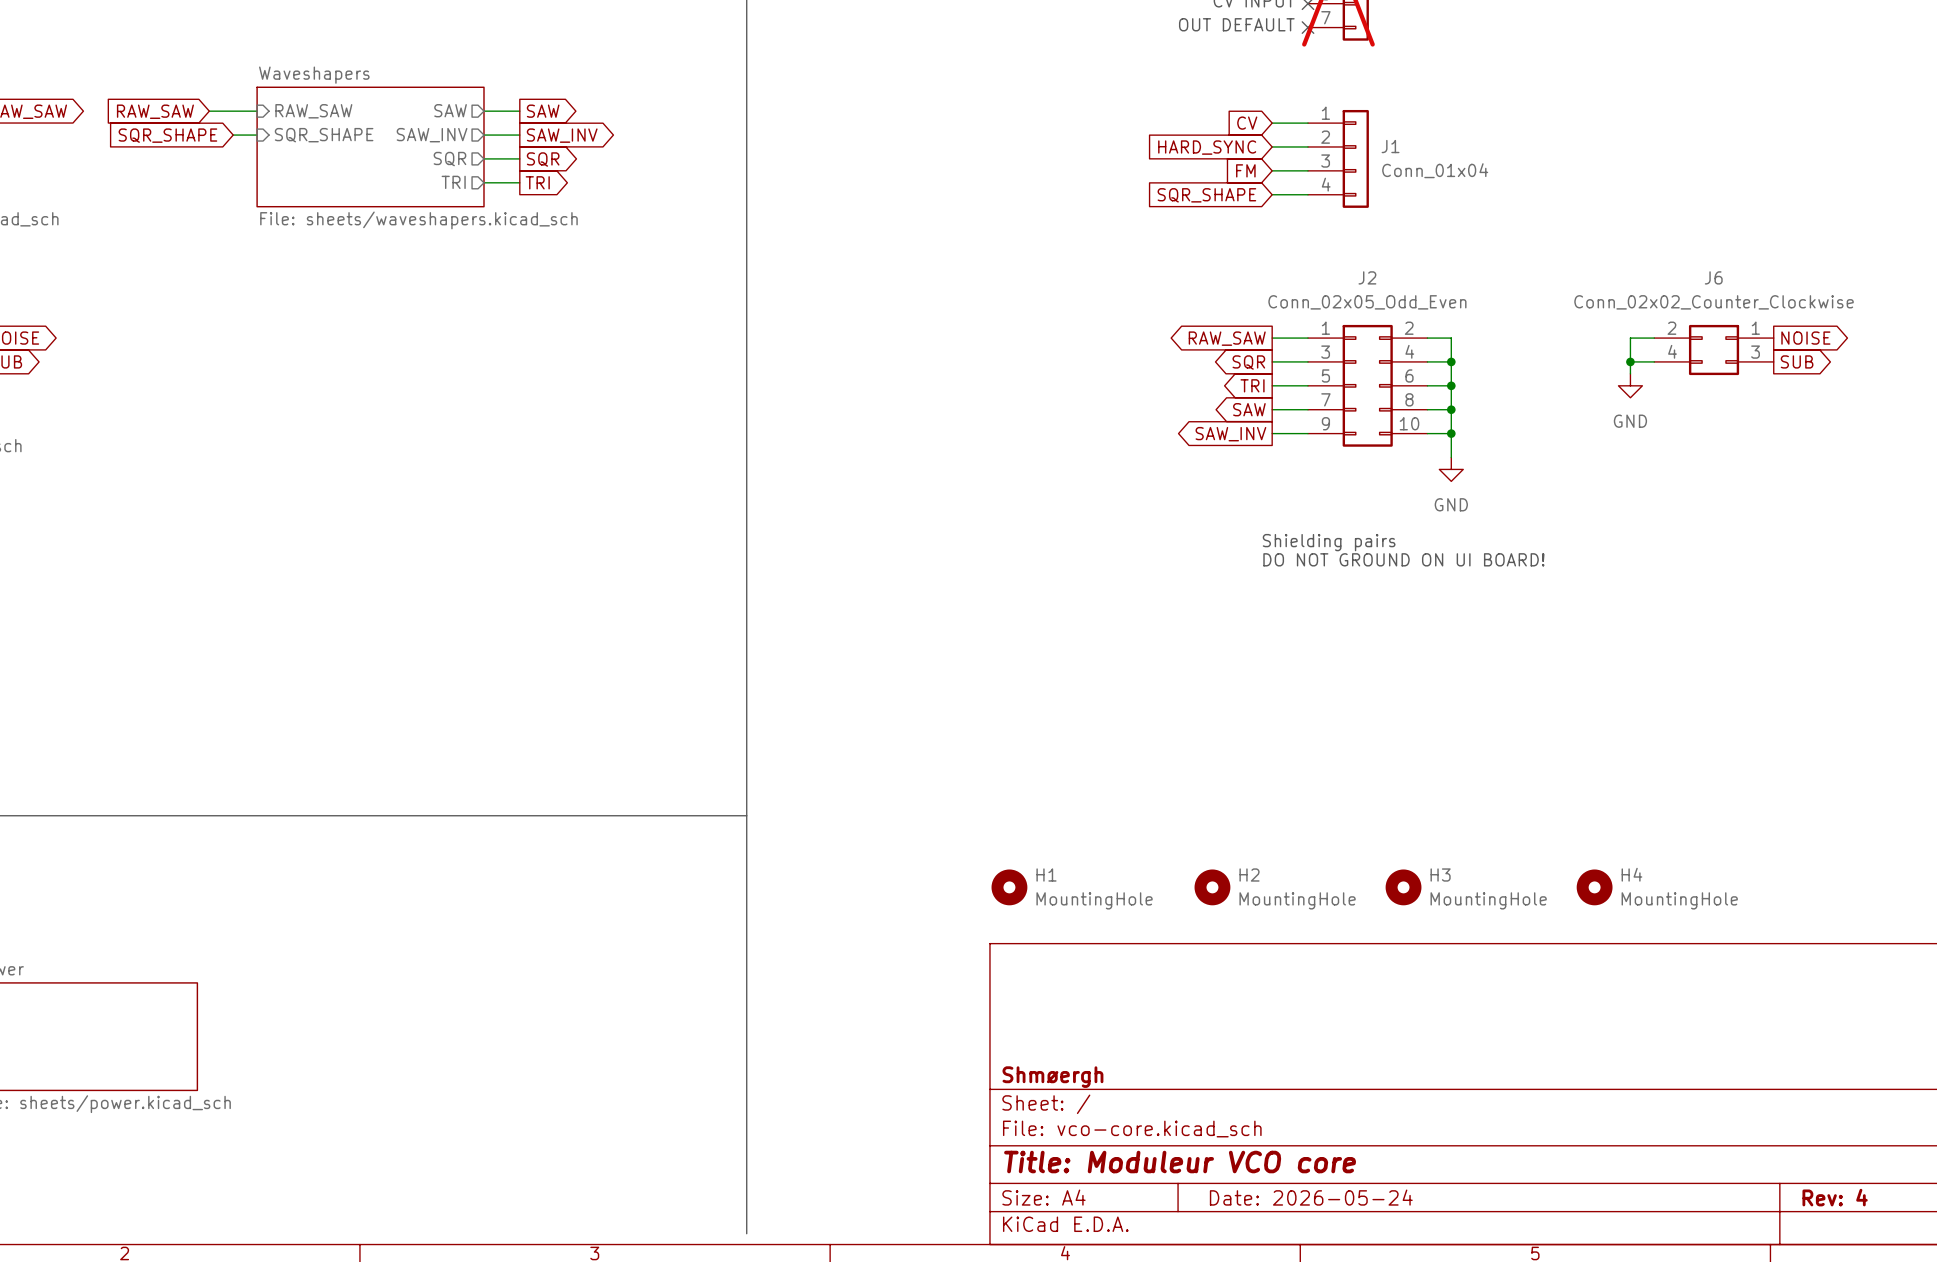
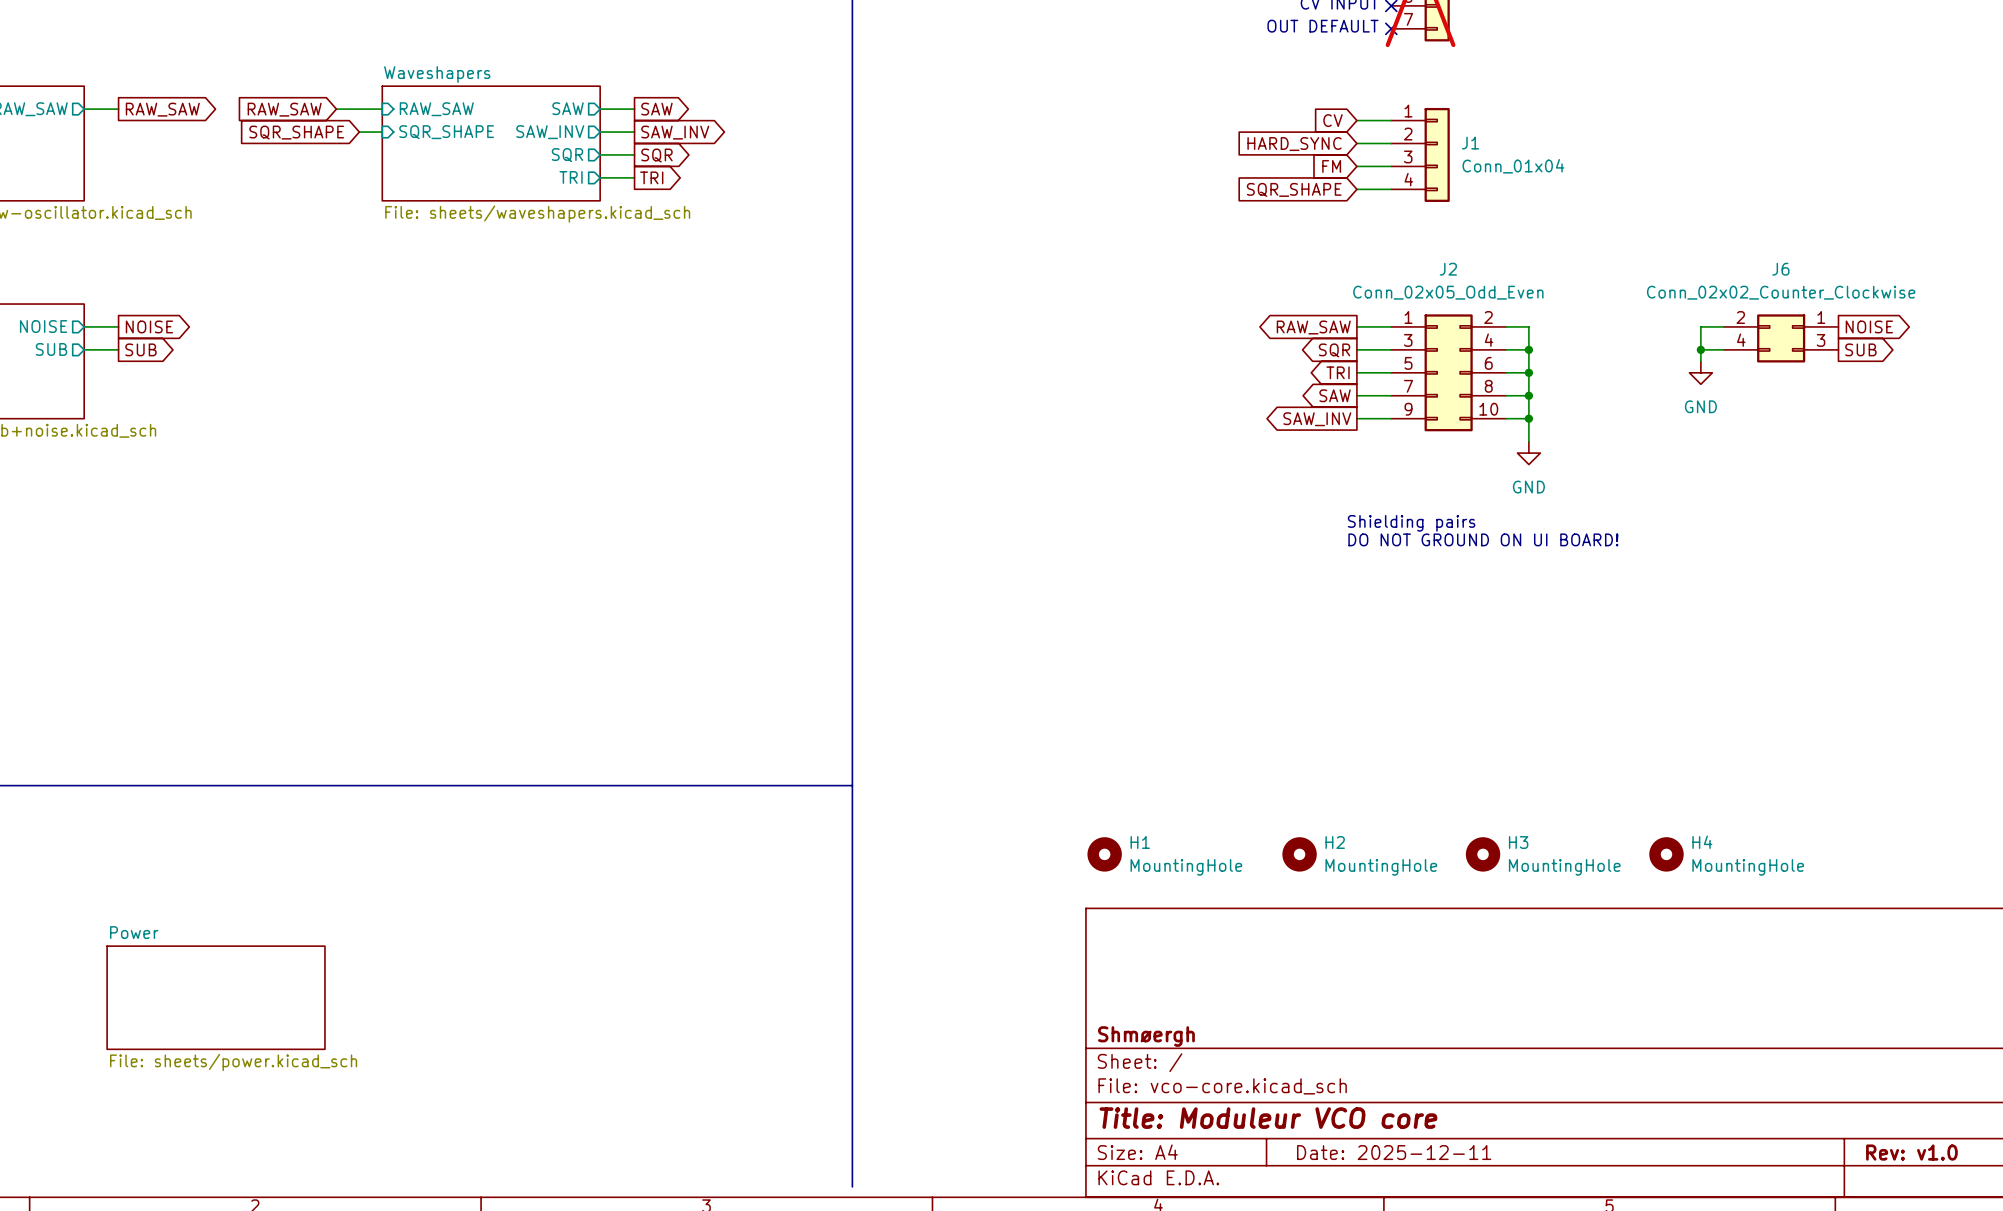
title block: Date: 2026-05-24 (1311, 1197) -> Date: 2025-12-11 (1394, 1152)
title block: Rev: 4 (1835, 1197) -> Rev: v1.0 (1911, 1152)

